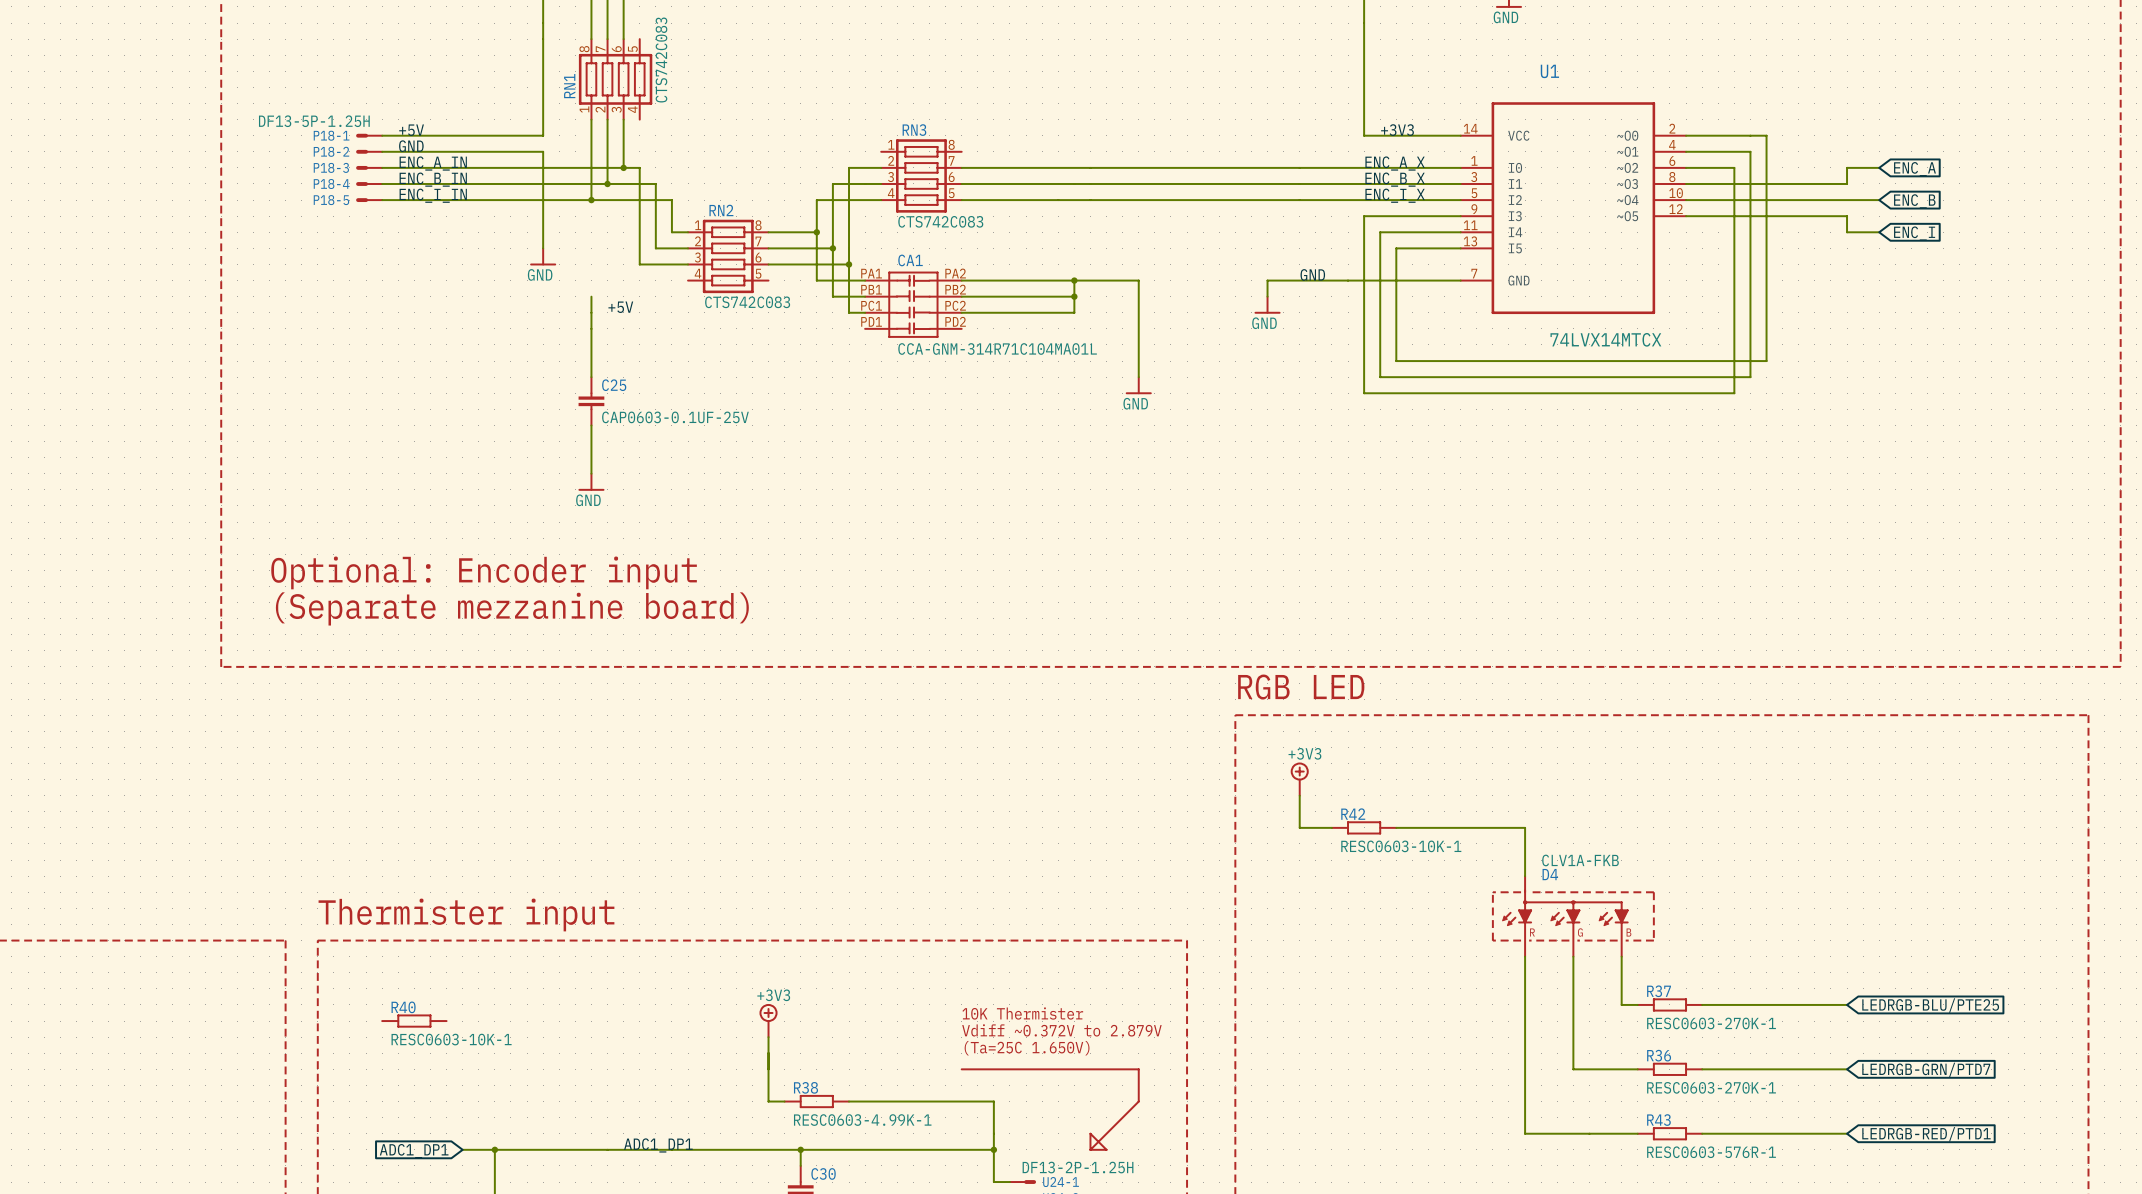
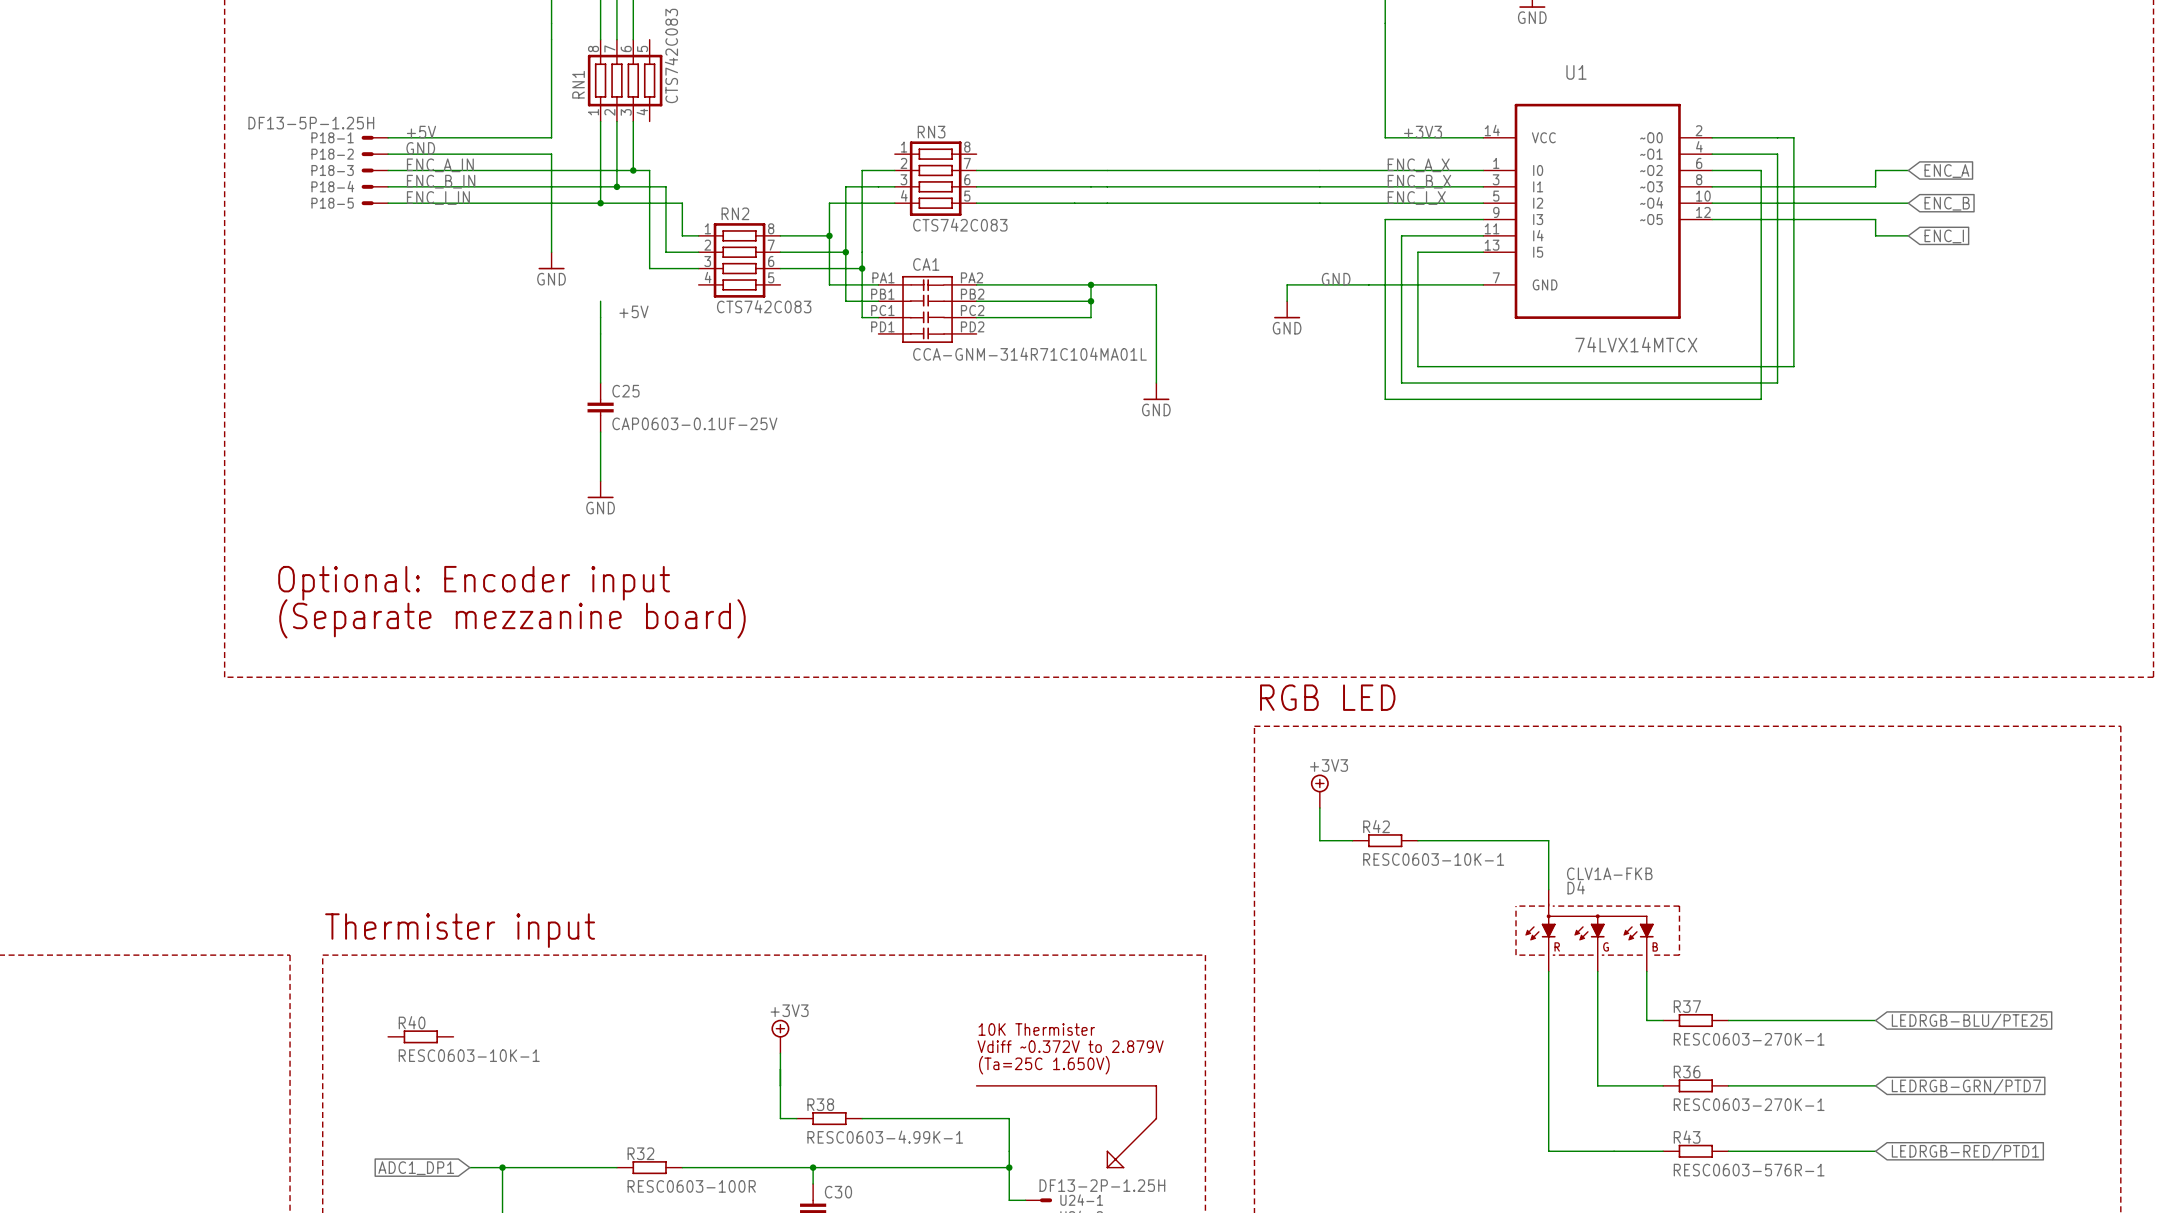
label: ADC1_DP1 (658, 1145) -> none
R32: none -> RESC0603-100R (649, 1167)

